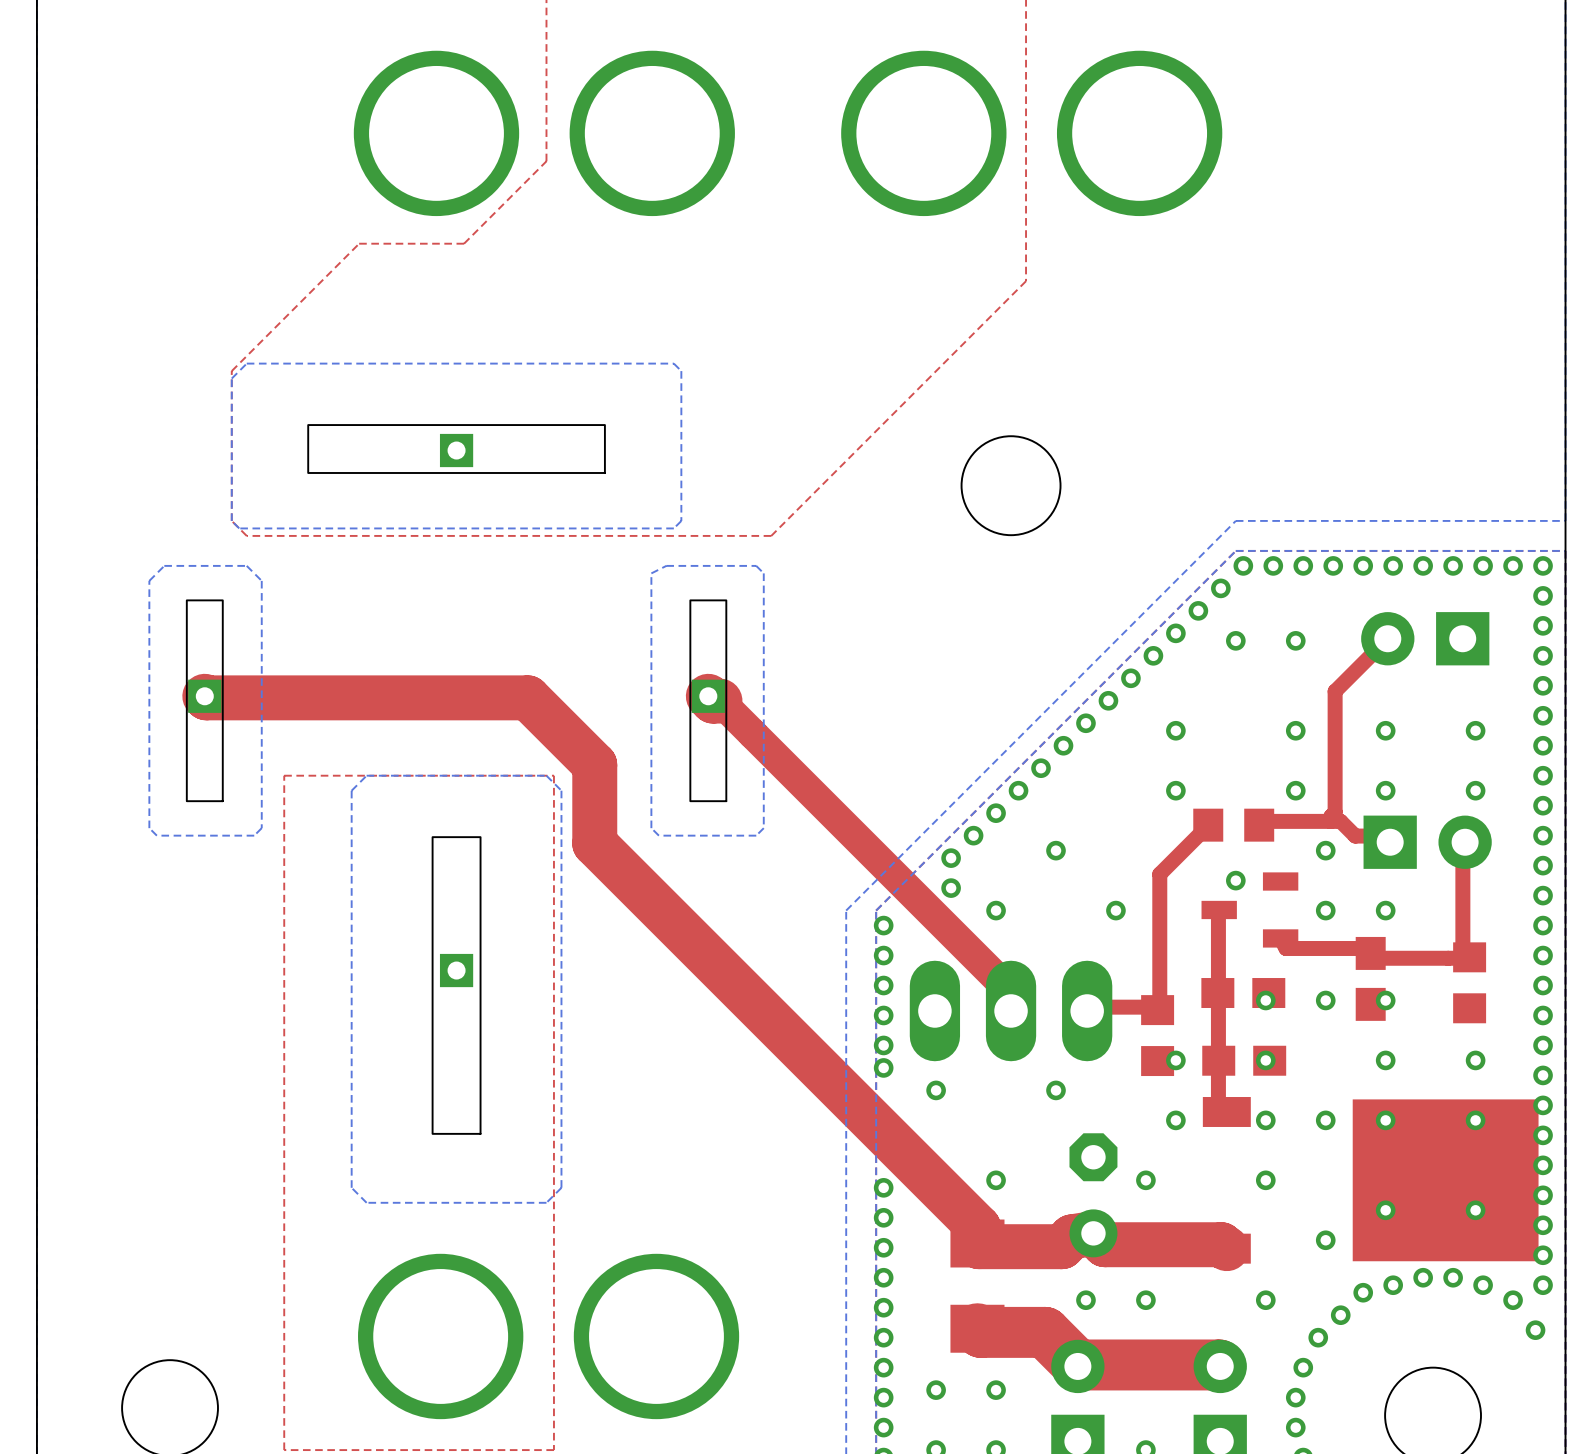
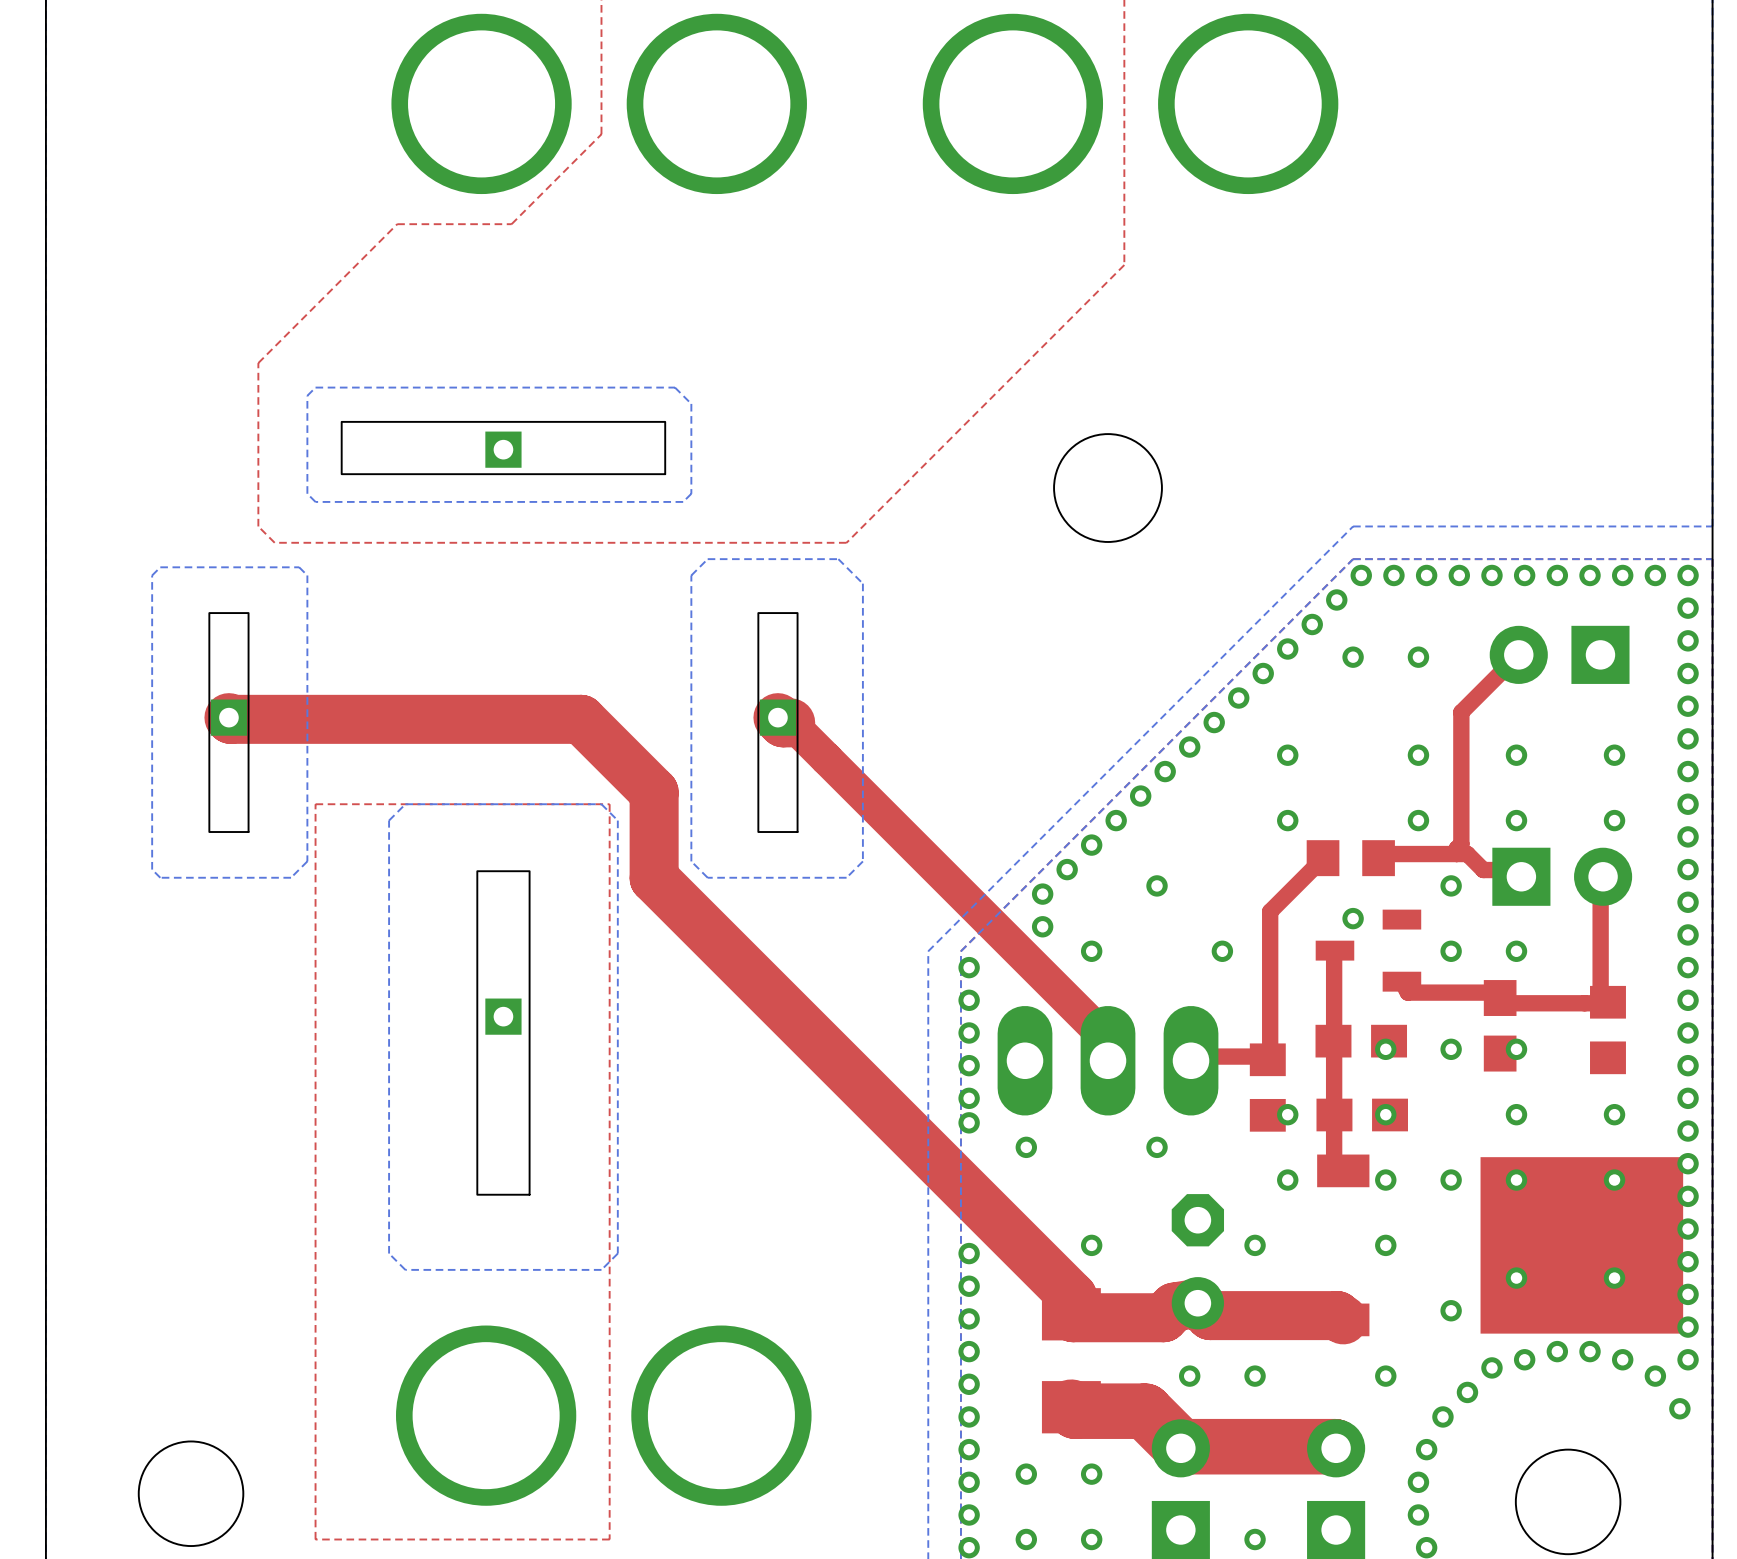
bottom zone outline: (673, 363) (246, 363) (231, 378) (231, 520) (239, 528) (673, 528) (681, 520) (681, 371) (673, 363) -> none
bottom zone outline: none -> (675, 387) (315, 387) (307, 395) (307, 493) (315, 501) (683, 501) (691, 493) (691, 403) (675, 387)
bottom zone outline: (246, 565) (164, 565) (149, 580) (149, 828) (156, 835) (254, 835) (261, 828) (261, 580) (246, 565) -> (299, 567) (307, 575) (307, 861) (291, 877) (160, 877) (152, 869) (152, 575) (160, 567) (299, 567)
bottom zone outline: (756, 565) (666, 565) (651, 573) (651, 828) (658, 835) (756, 835) (763, 828) (763, 573) (756, 565) -> (838, 559) (862, 583) (862, 861) (846, 877) (707, 877) (691, 861) (691, 575) (707, 559) (838, 559)

